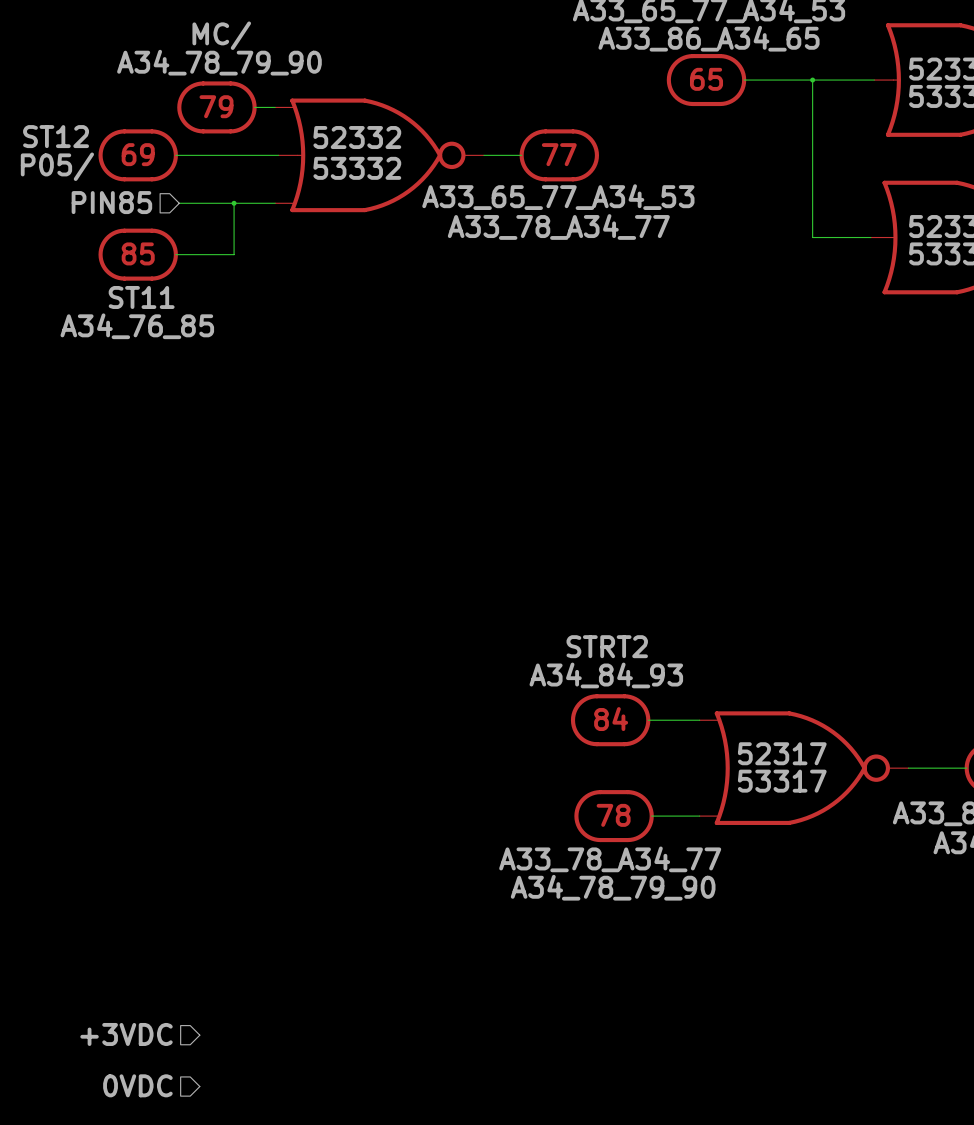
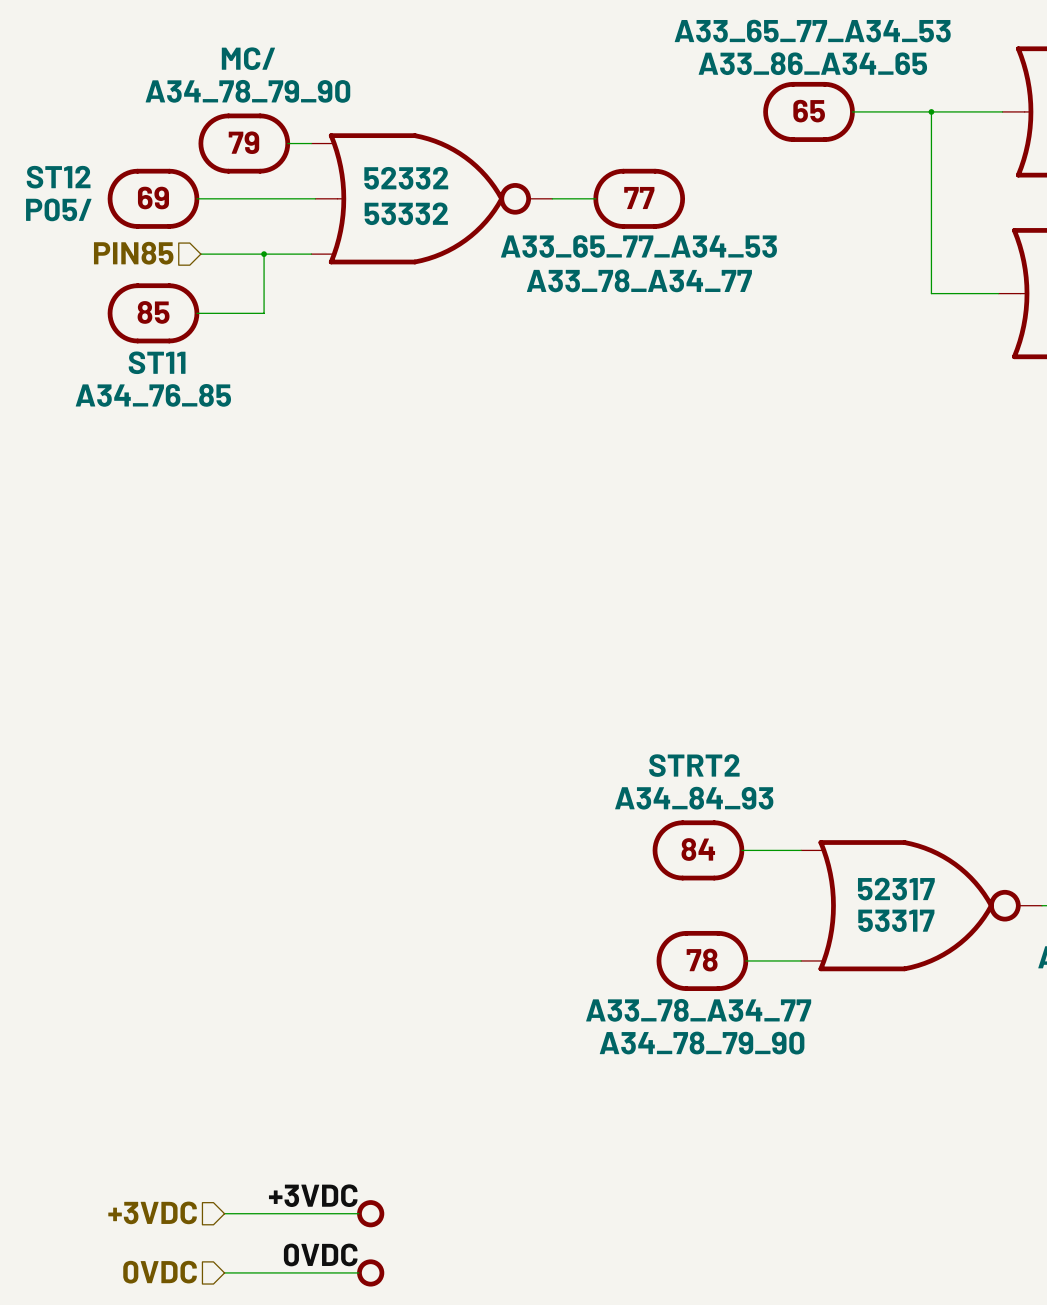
label: none -> +3VDC (313, 1195)
wire: none -> (224, 1213) (358, 1213)
part: none -> (370, 1213)
label: none -> 0VDC (320, 1254)
wire: none -> (224, 1272) (358, 1272)
part: none -> (370, 1272)

